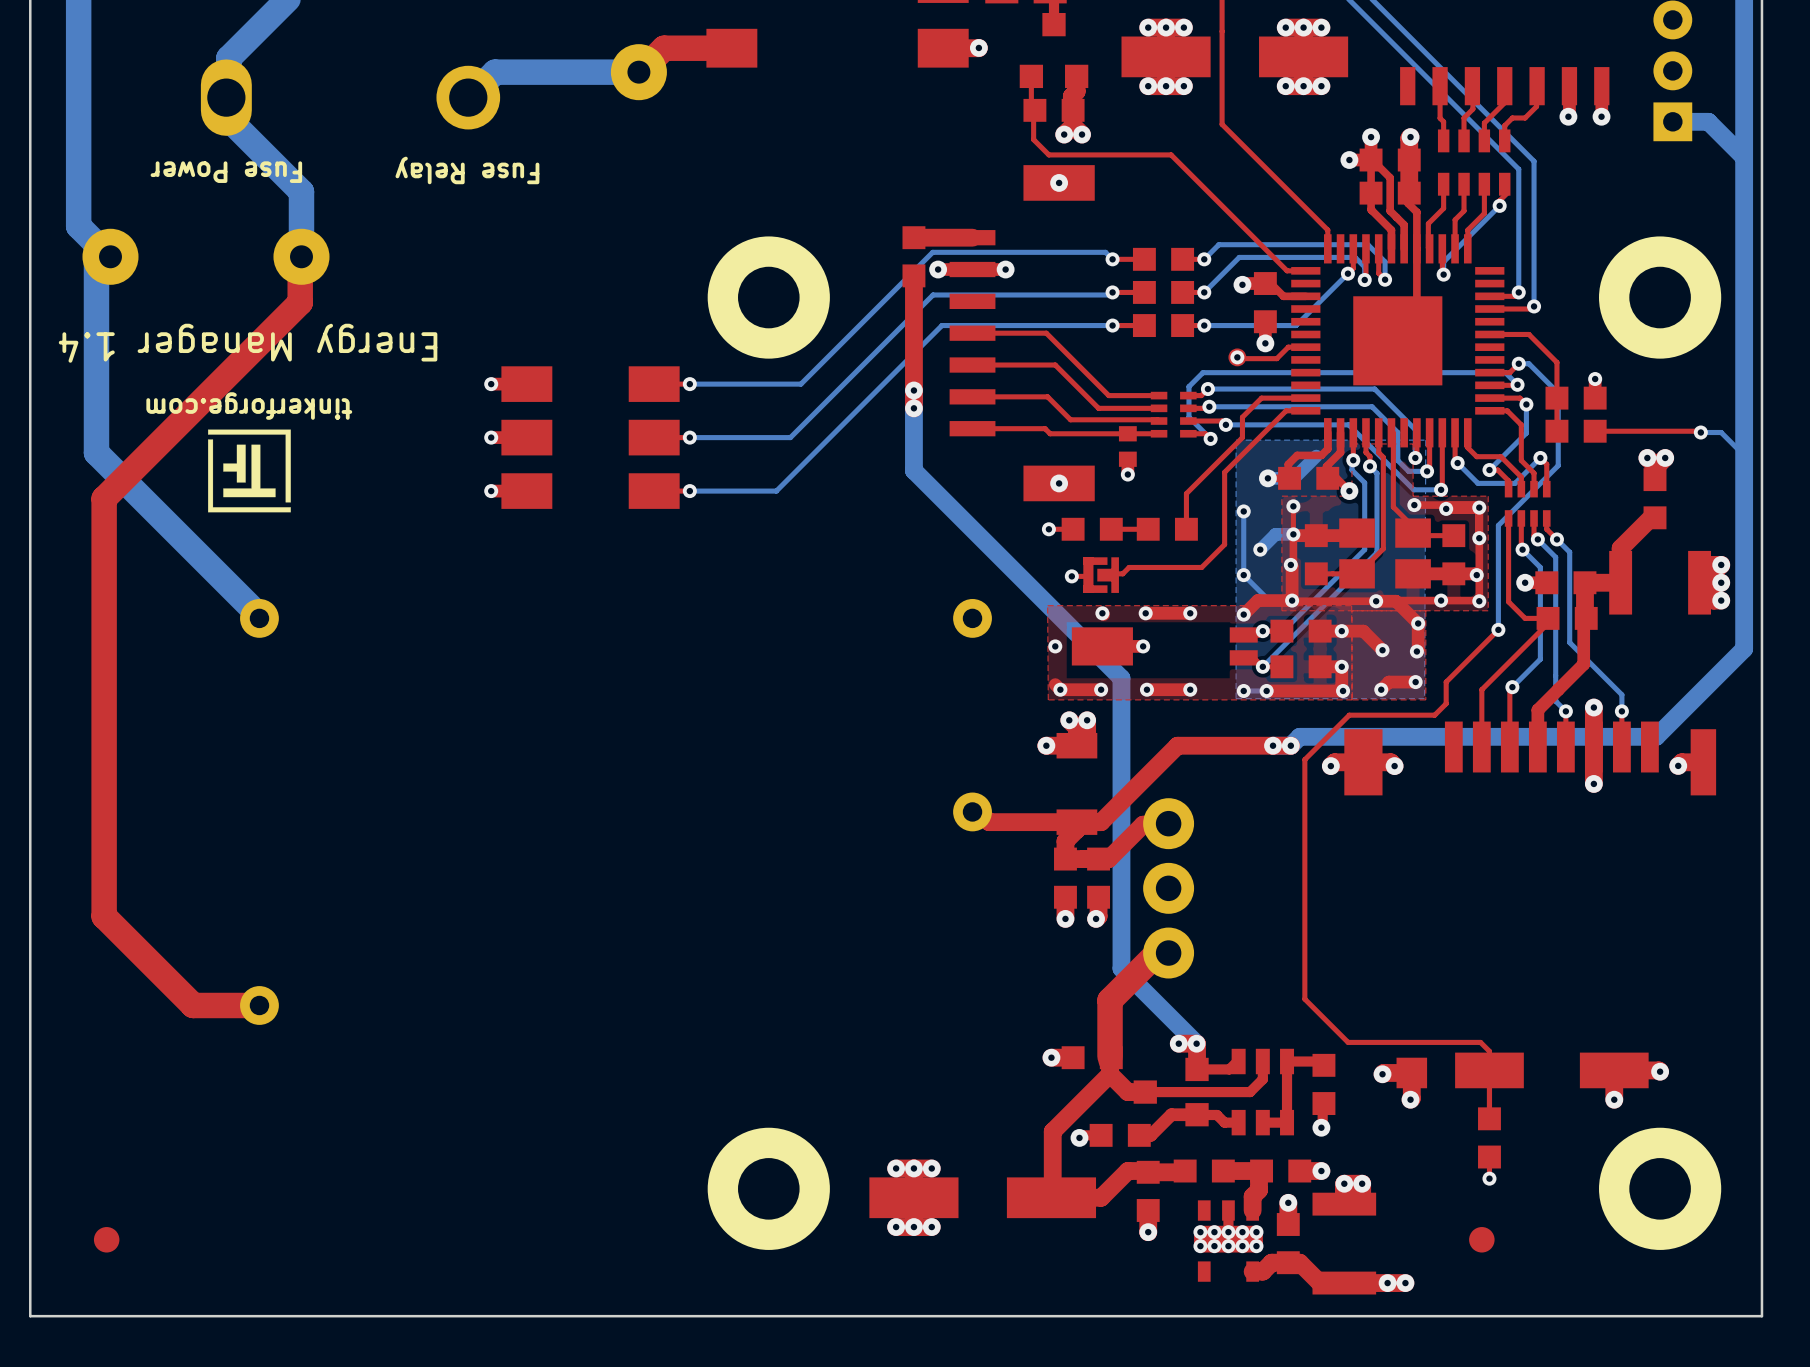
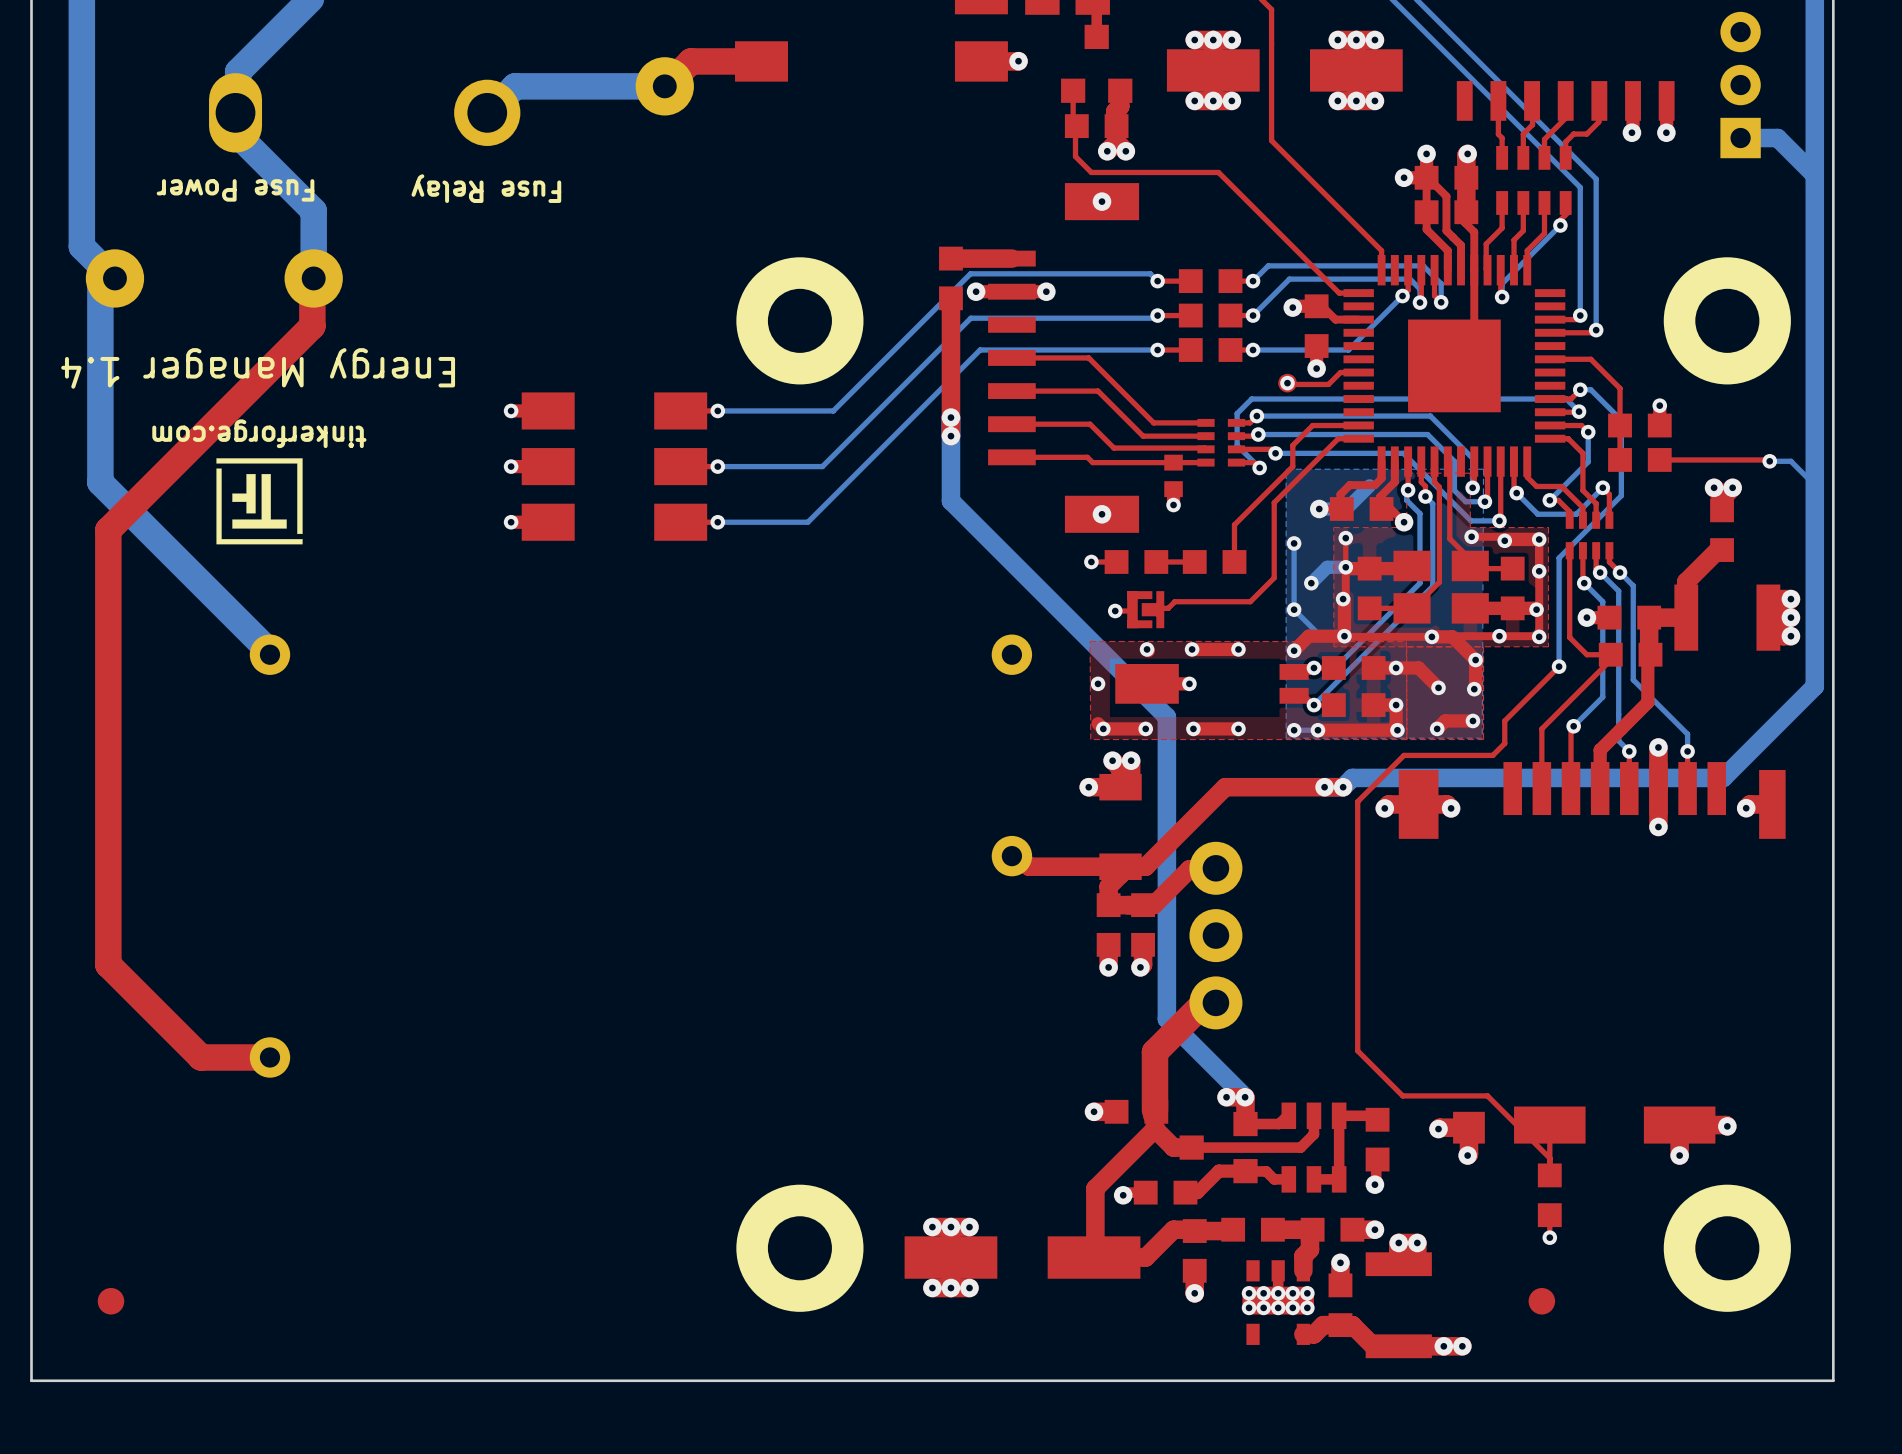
top track: (1429, 1042) (1480, 1042) (1489, 1051) (1489, 1070) -> (1487, 1095) (1549, 1158)

